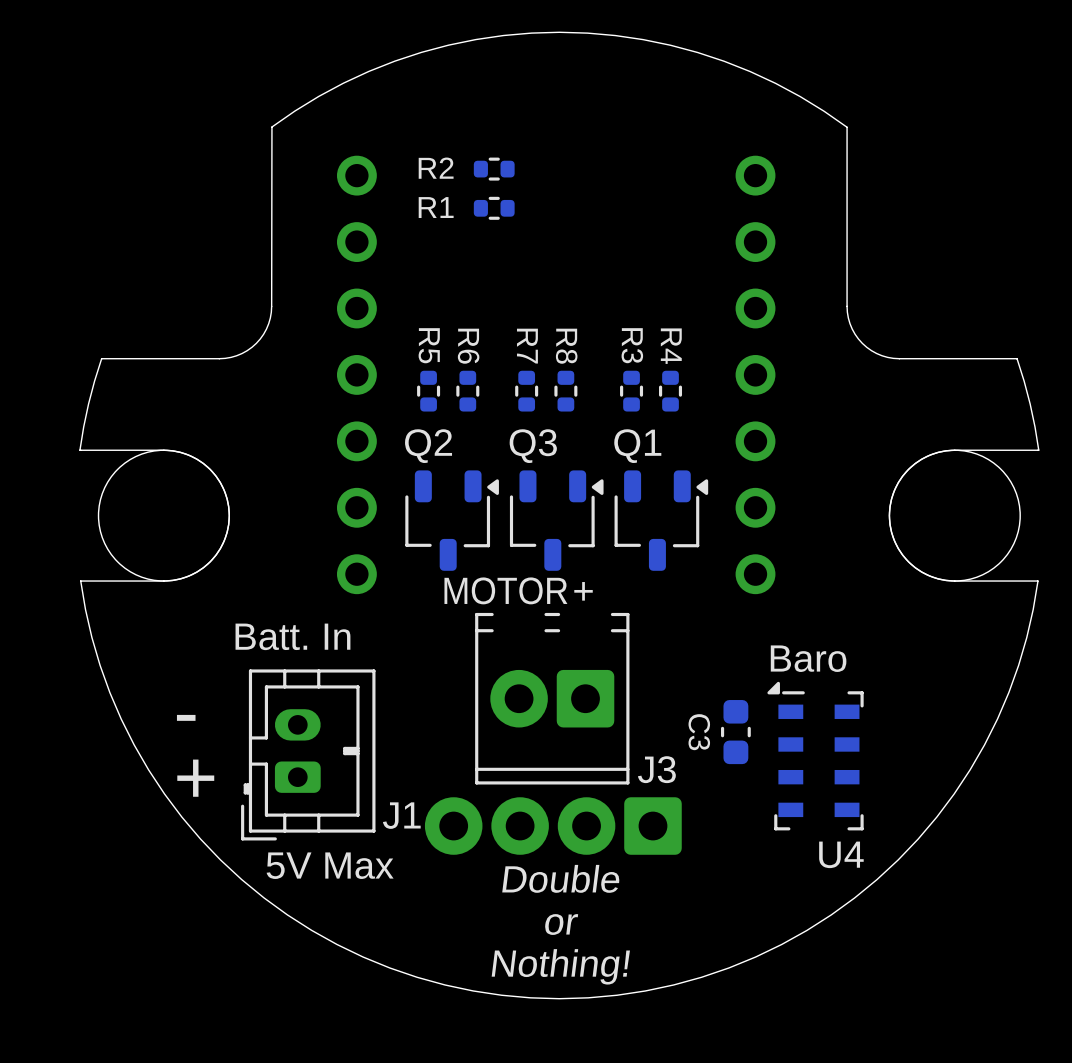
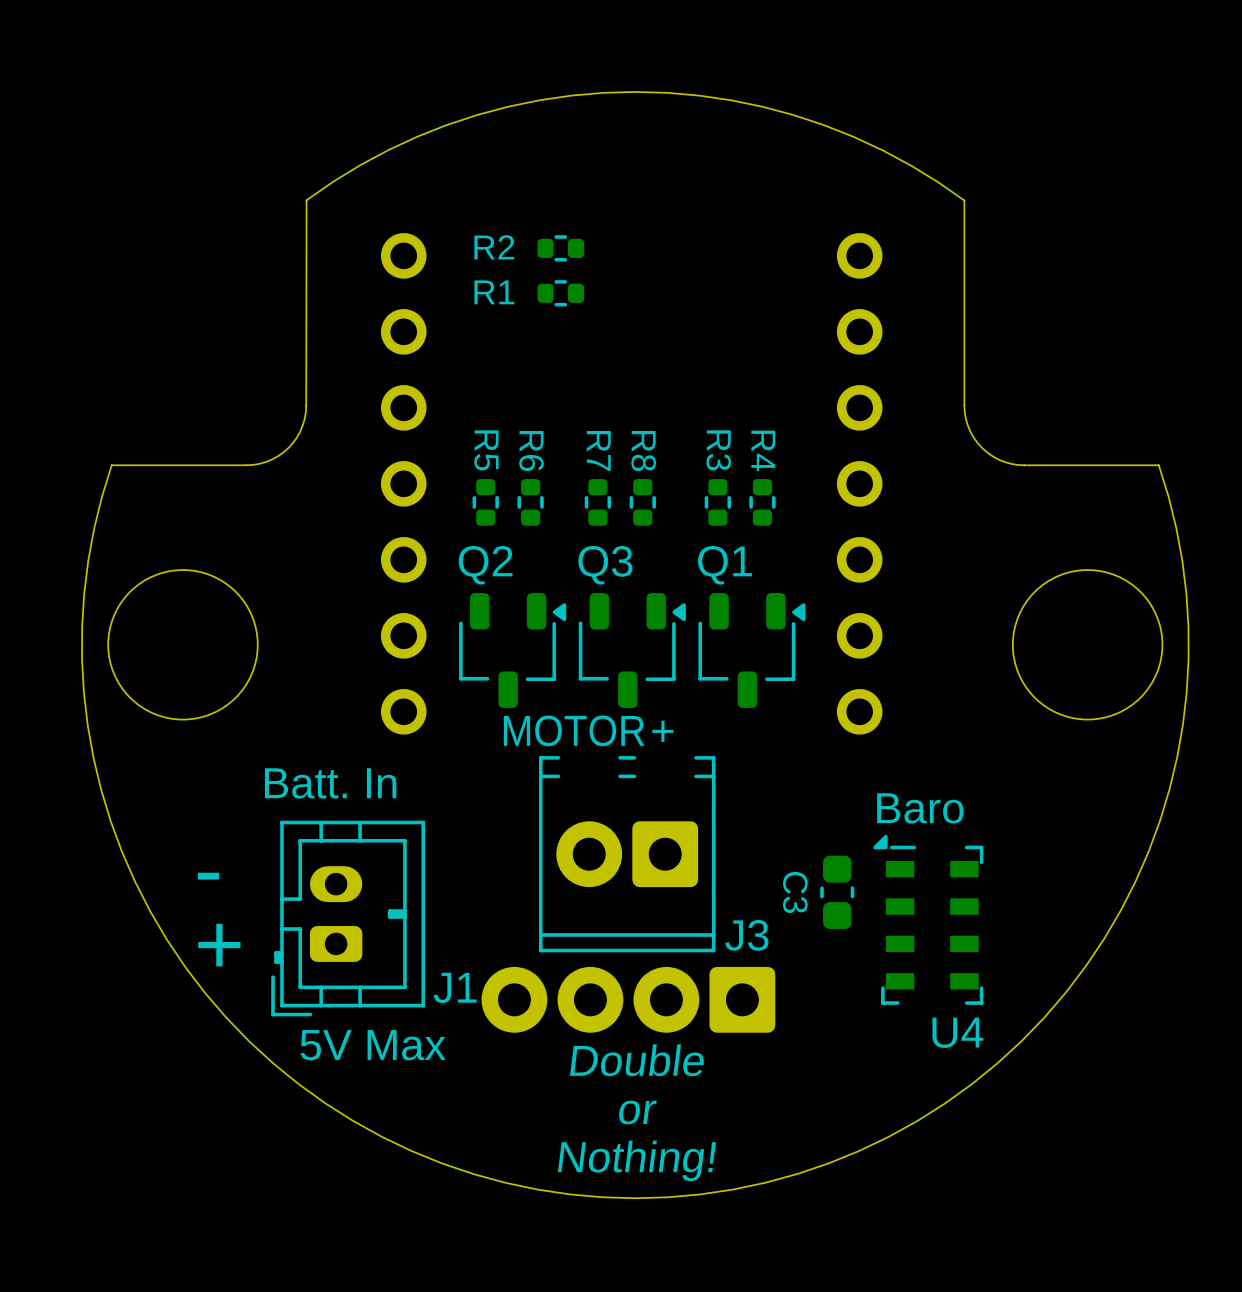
board edge: (1017, 358) (1030, 403) (1038, 450) (954, 450) (929, 455) (915, 463) (902, 475) (894, 490) (889, 507) (889, 524) (898, 548) (908, 561) (922, 572) (946, 580) (1037, 581) (1026, 637) (1008, 692) (984, 744) (954, 793) (918, 839) (876, 879) (831, 914) (781, 944) (728, 967) (673, 984) (616, 995) (559, 998) (501, 995) (444, 984) (389, 967) (336, 944) (287, 914) (241, 879) (200, 839) (164, 793) (134, 744) (109, 692) (91, 637) (80, 581) (172, 580) (196, 572) (210, 561) (220, 548) (228, 524) (228, 507) (224, 490) (215, 475) (203, 463) (188, 455) (163, 450) (79, 450) (88, 403) (101, 358) -> (1158, 465) (1176, 528) (1186, 593) (1188, 659) (1182, 724) (1169, 789) (1148, 851) (1120, 910) (1085, 966) (1044, 1017) (997, 1063) (945, 1103) (888, 1136) (828, 1163) (765, 1182) (700, 1194) (635, 1198) (569, 1194) (505, 1182) (442, 1163) (382, 1136) (325, 1103) (273, 1063) (226, 1017) (184, 966) (149, 910) (121, 851) (100, 789) (87, 724) (82, 659) (84, 593) (94, 528) (111, 465)

